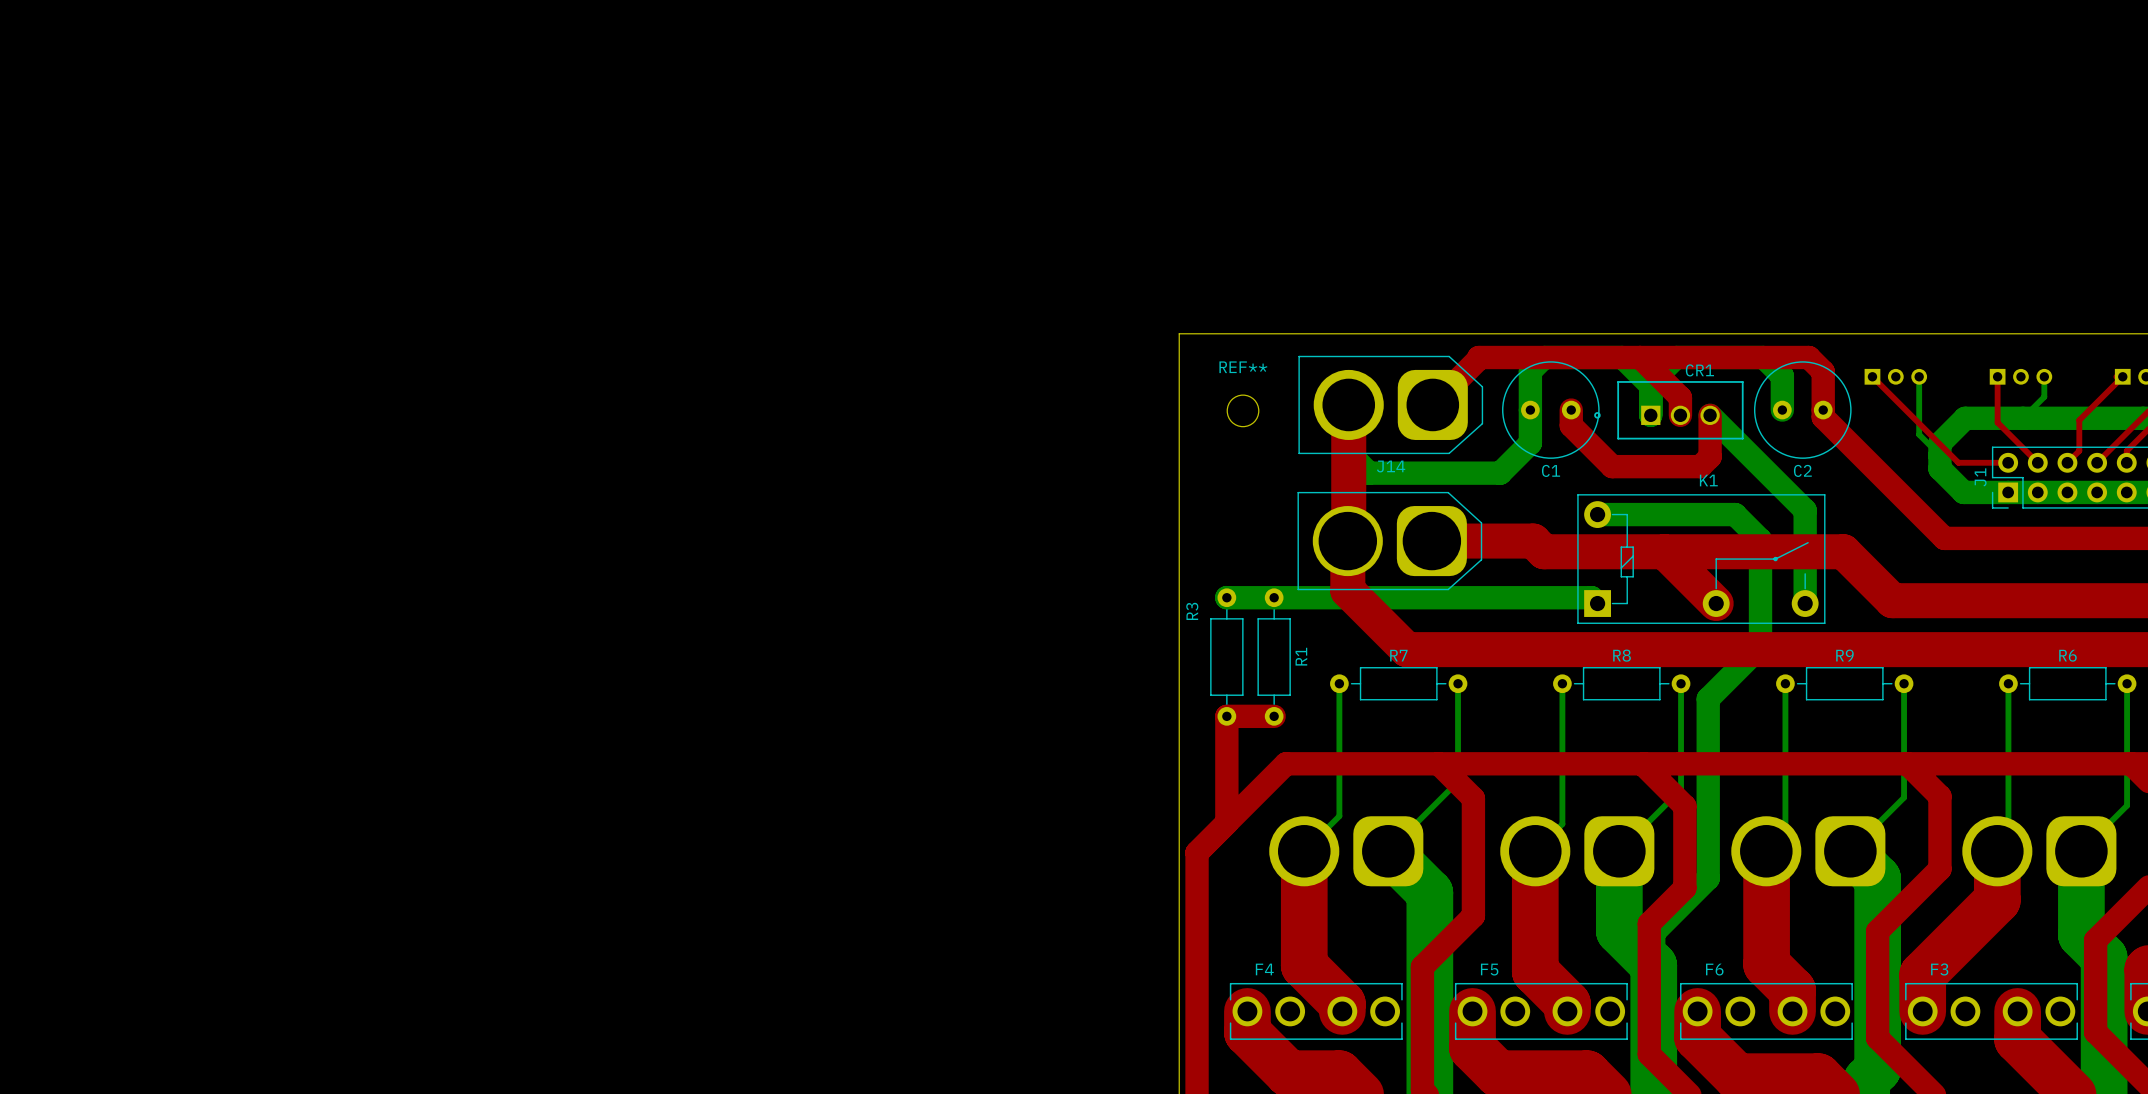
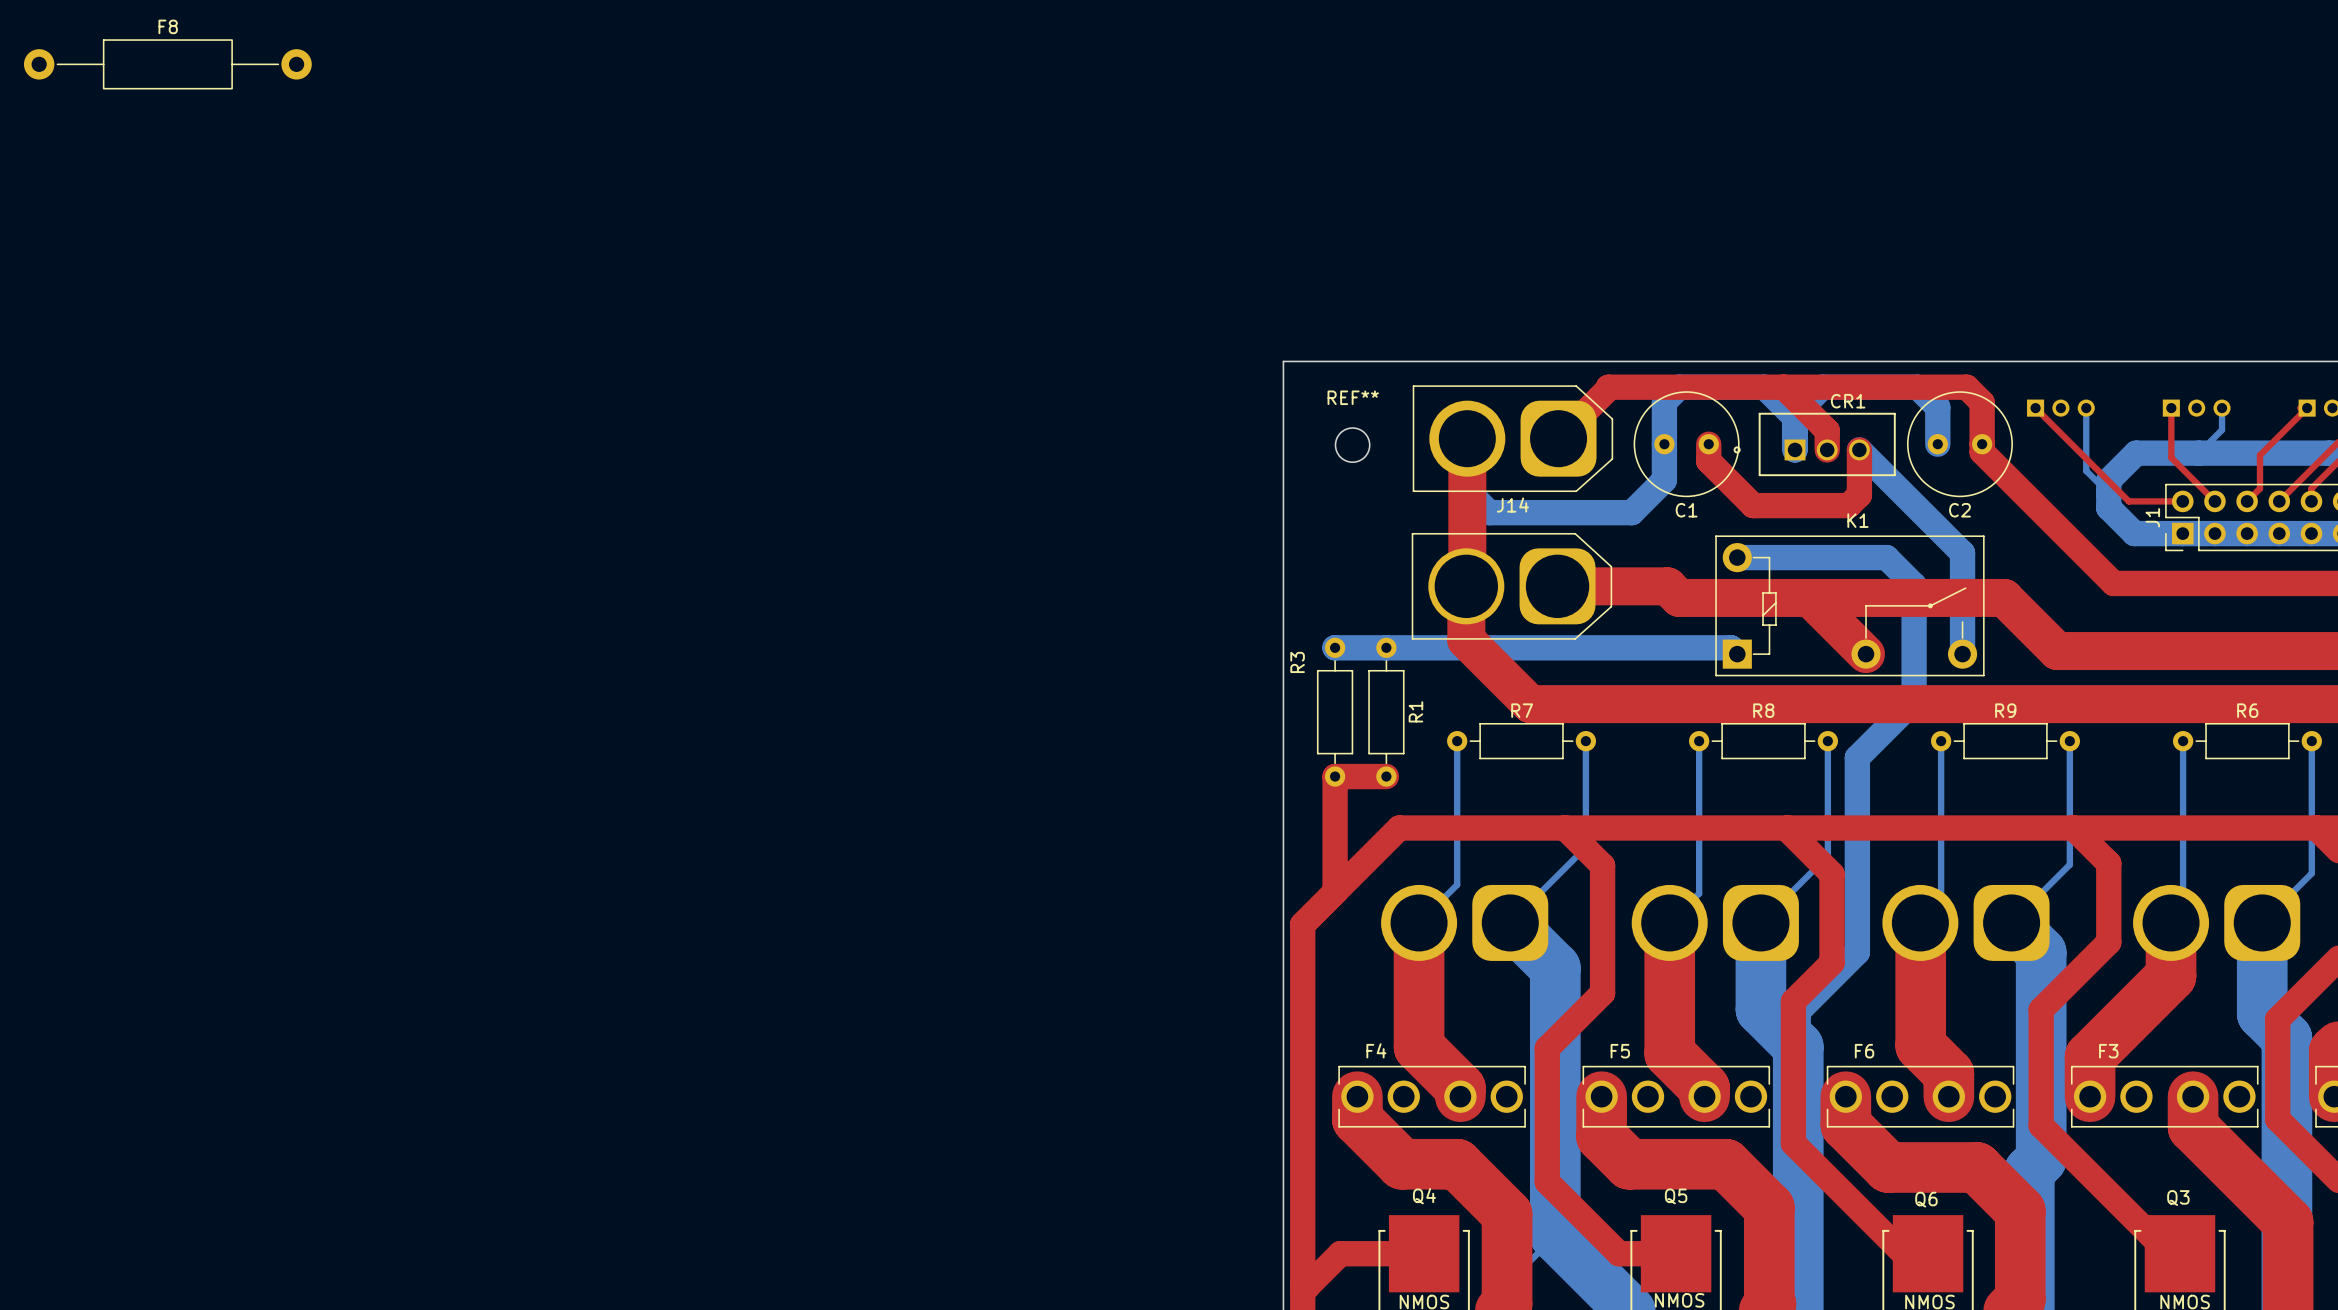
F8: none -> (167, 64)

